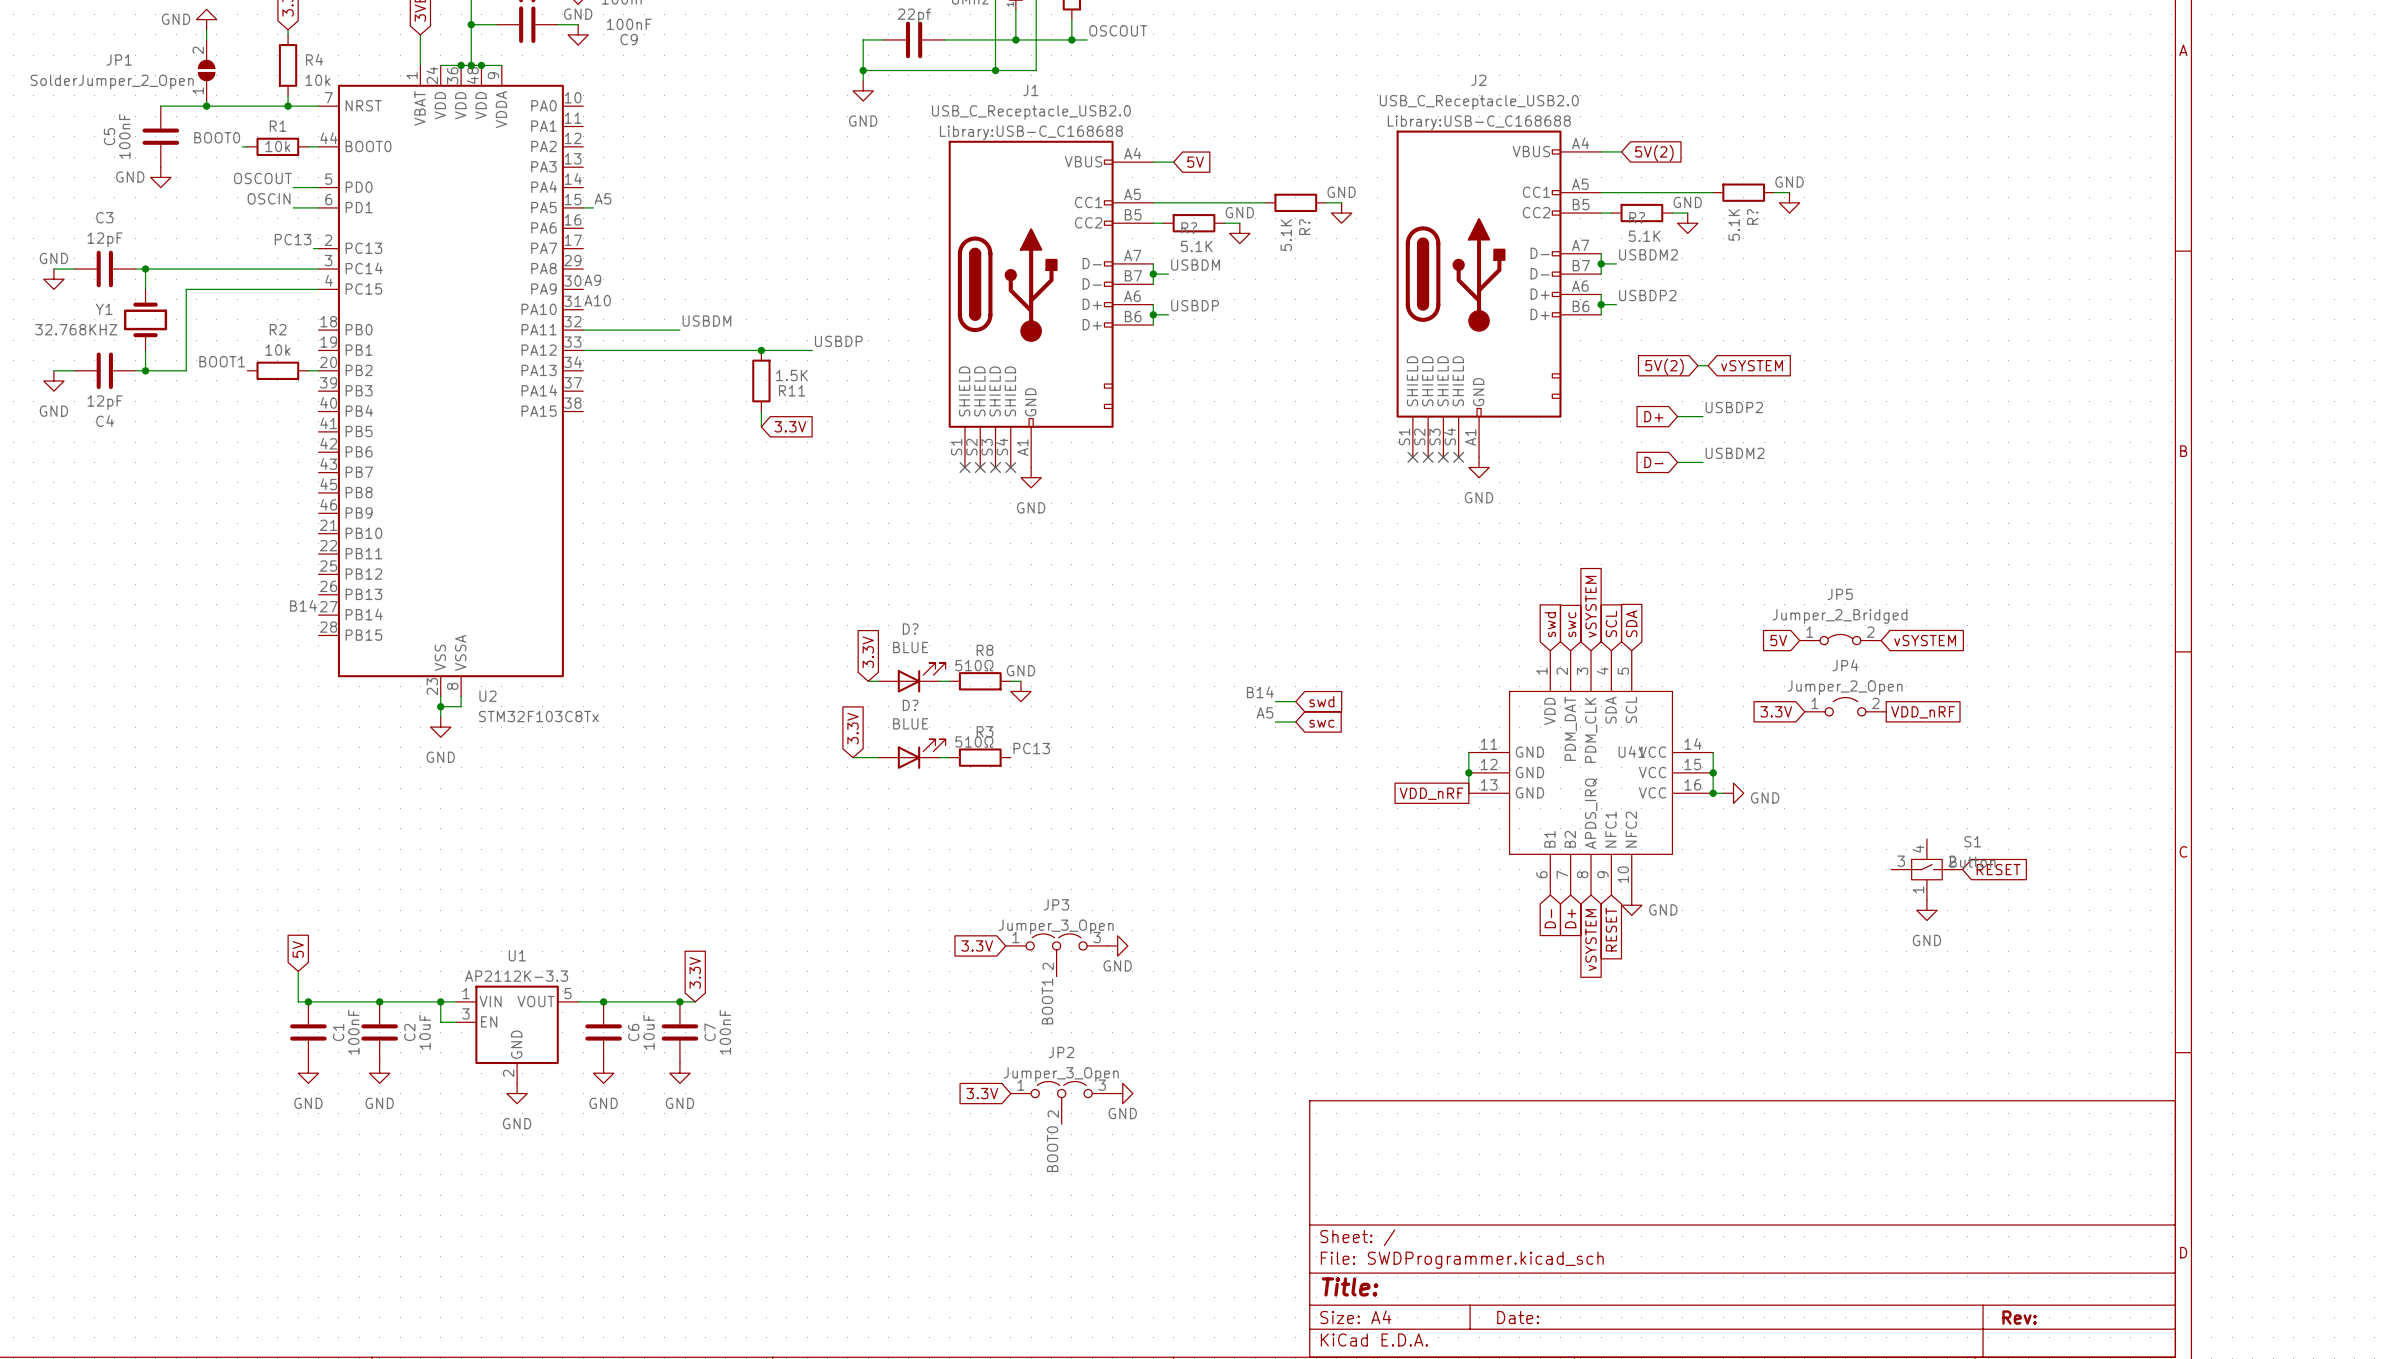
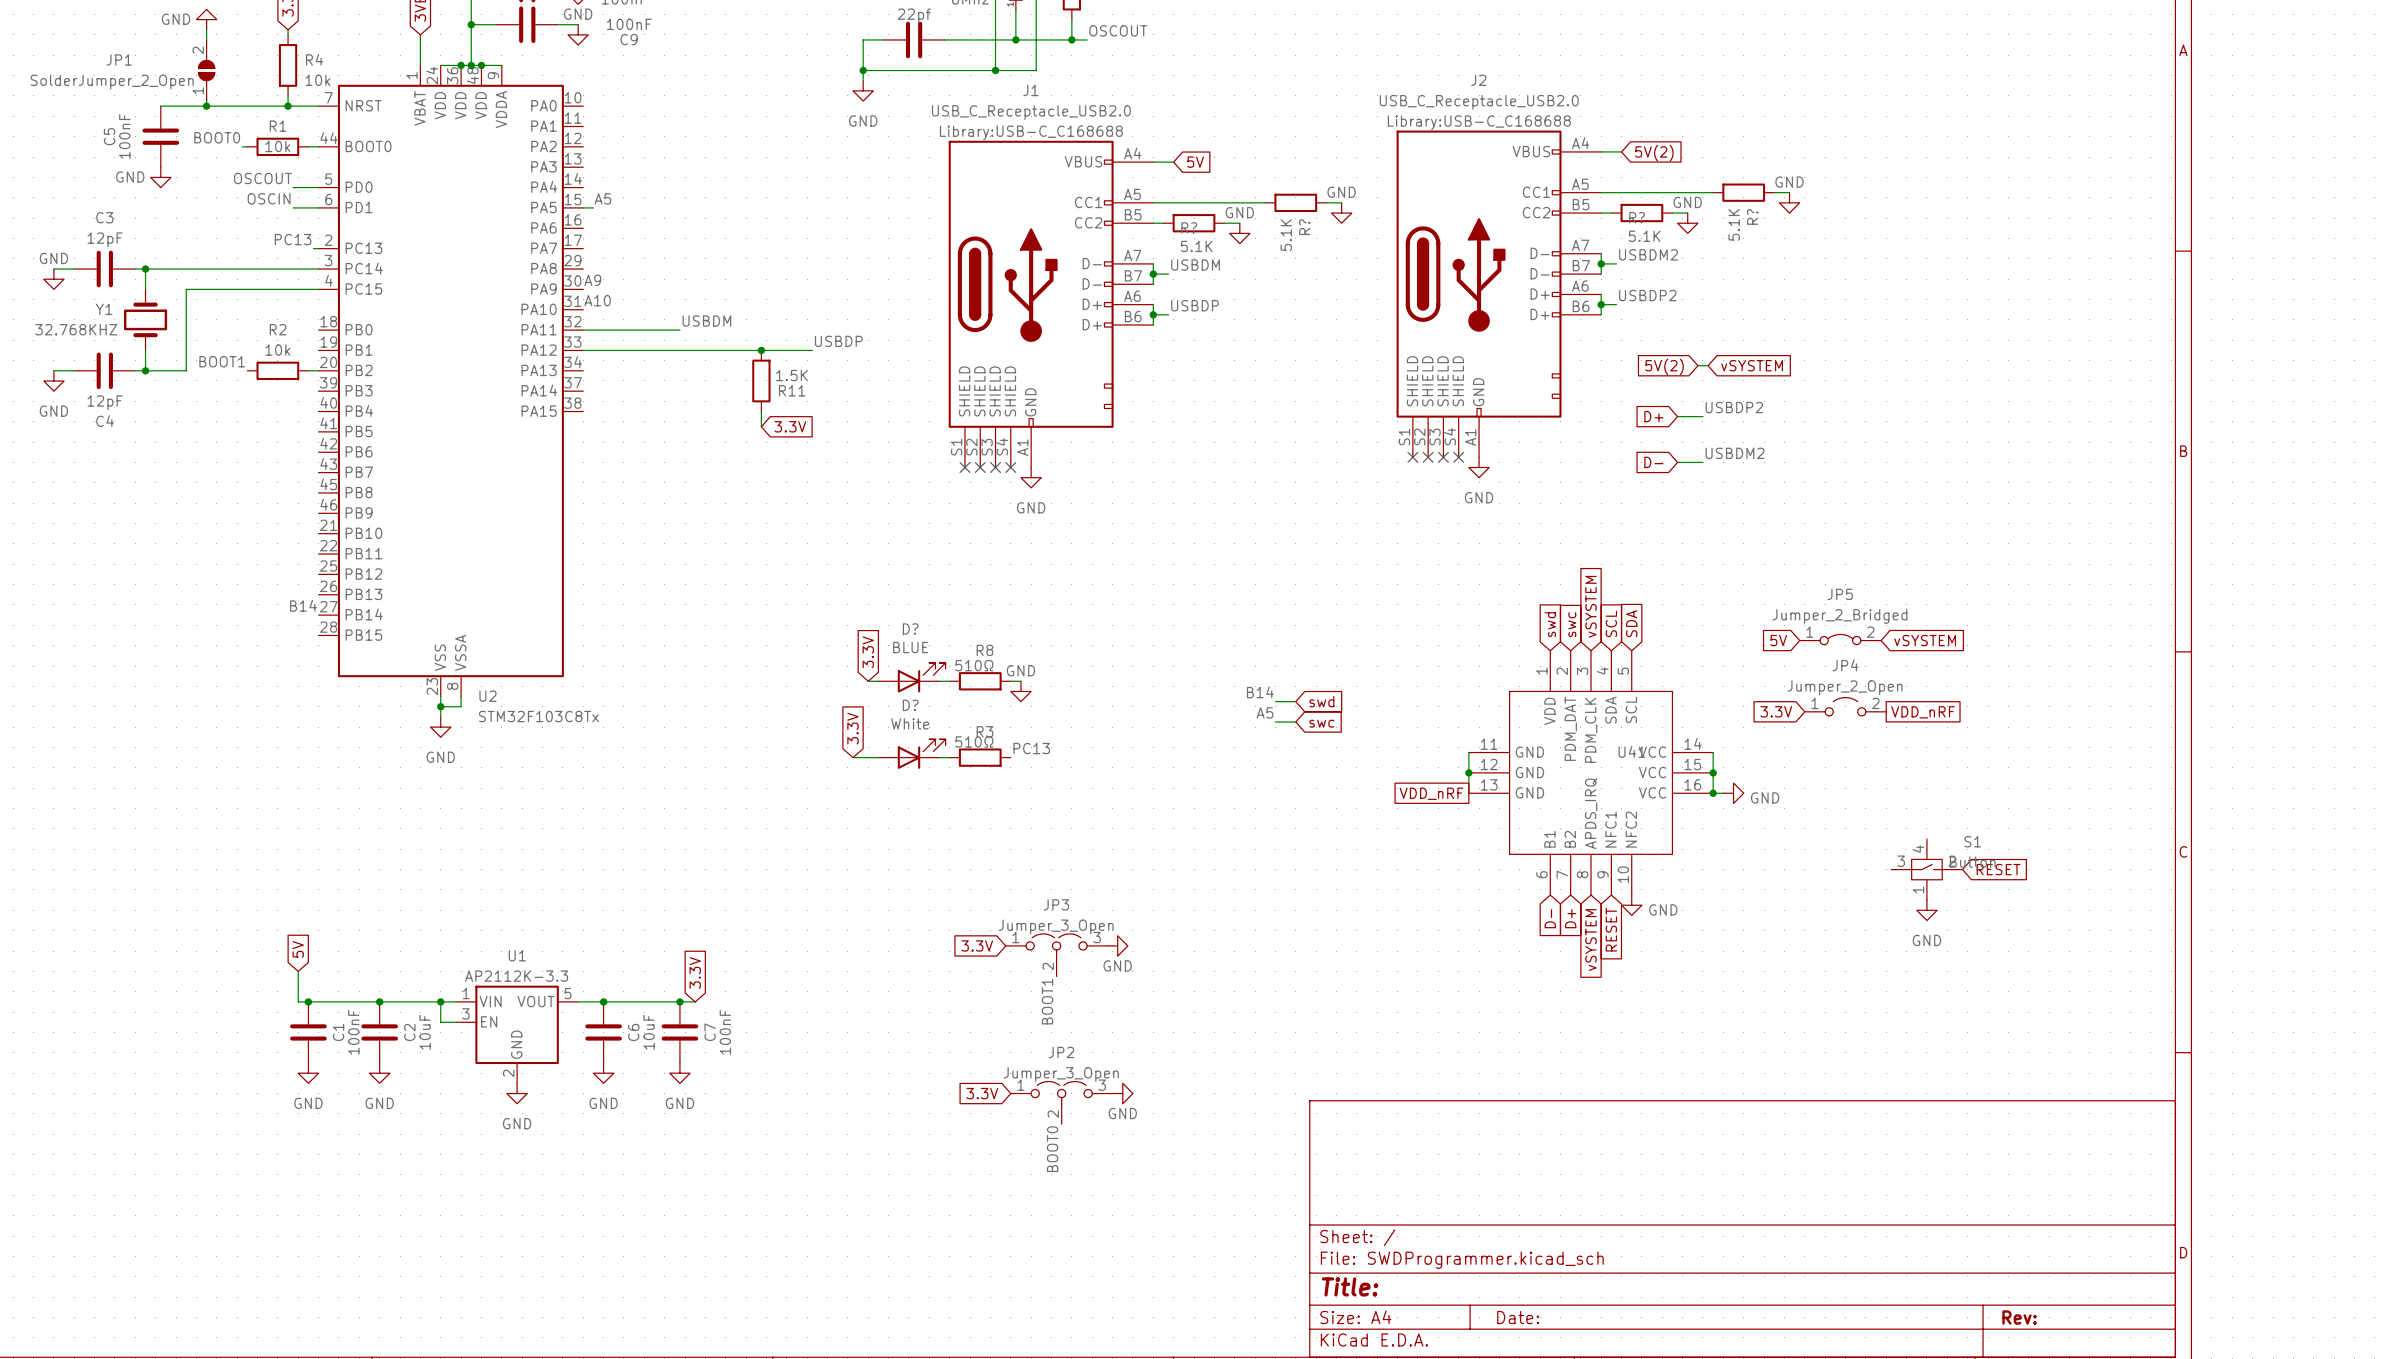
D? value: BLUE (910, 723) -> White (910, 723)

